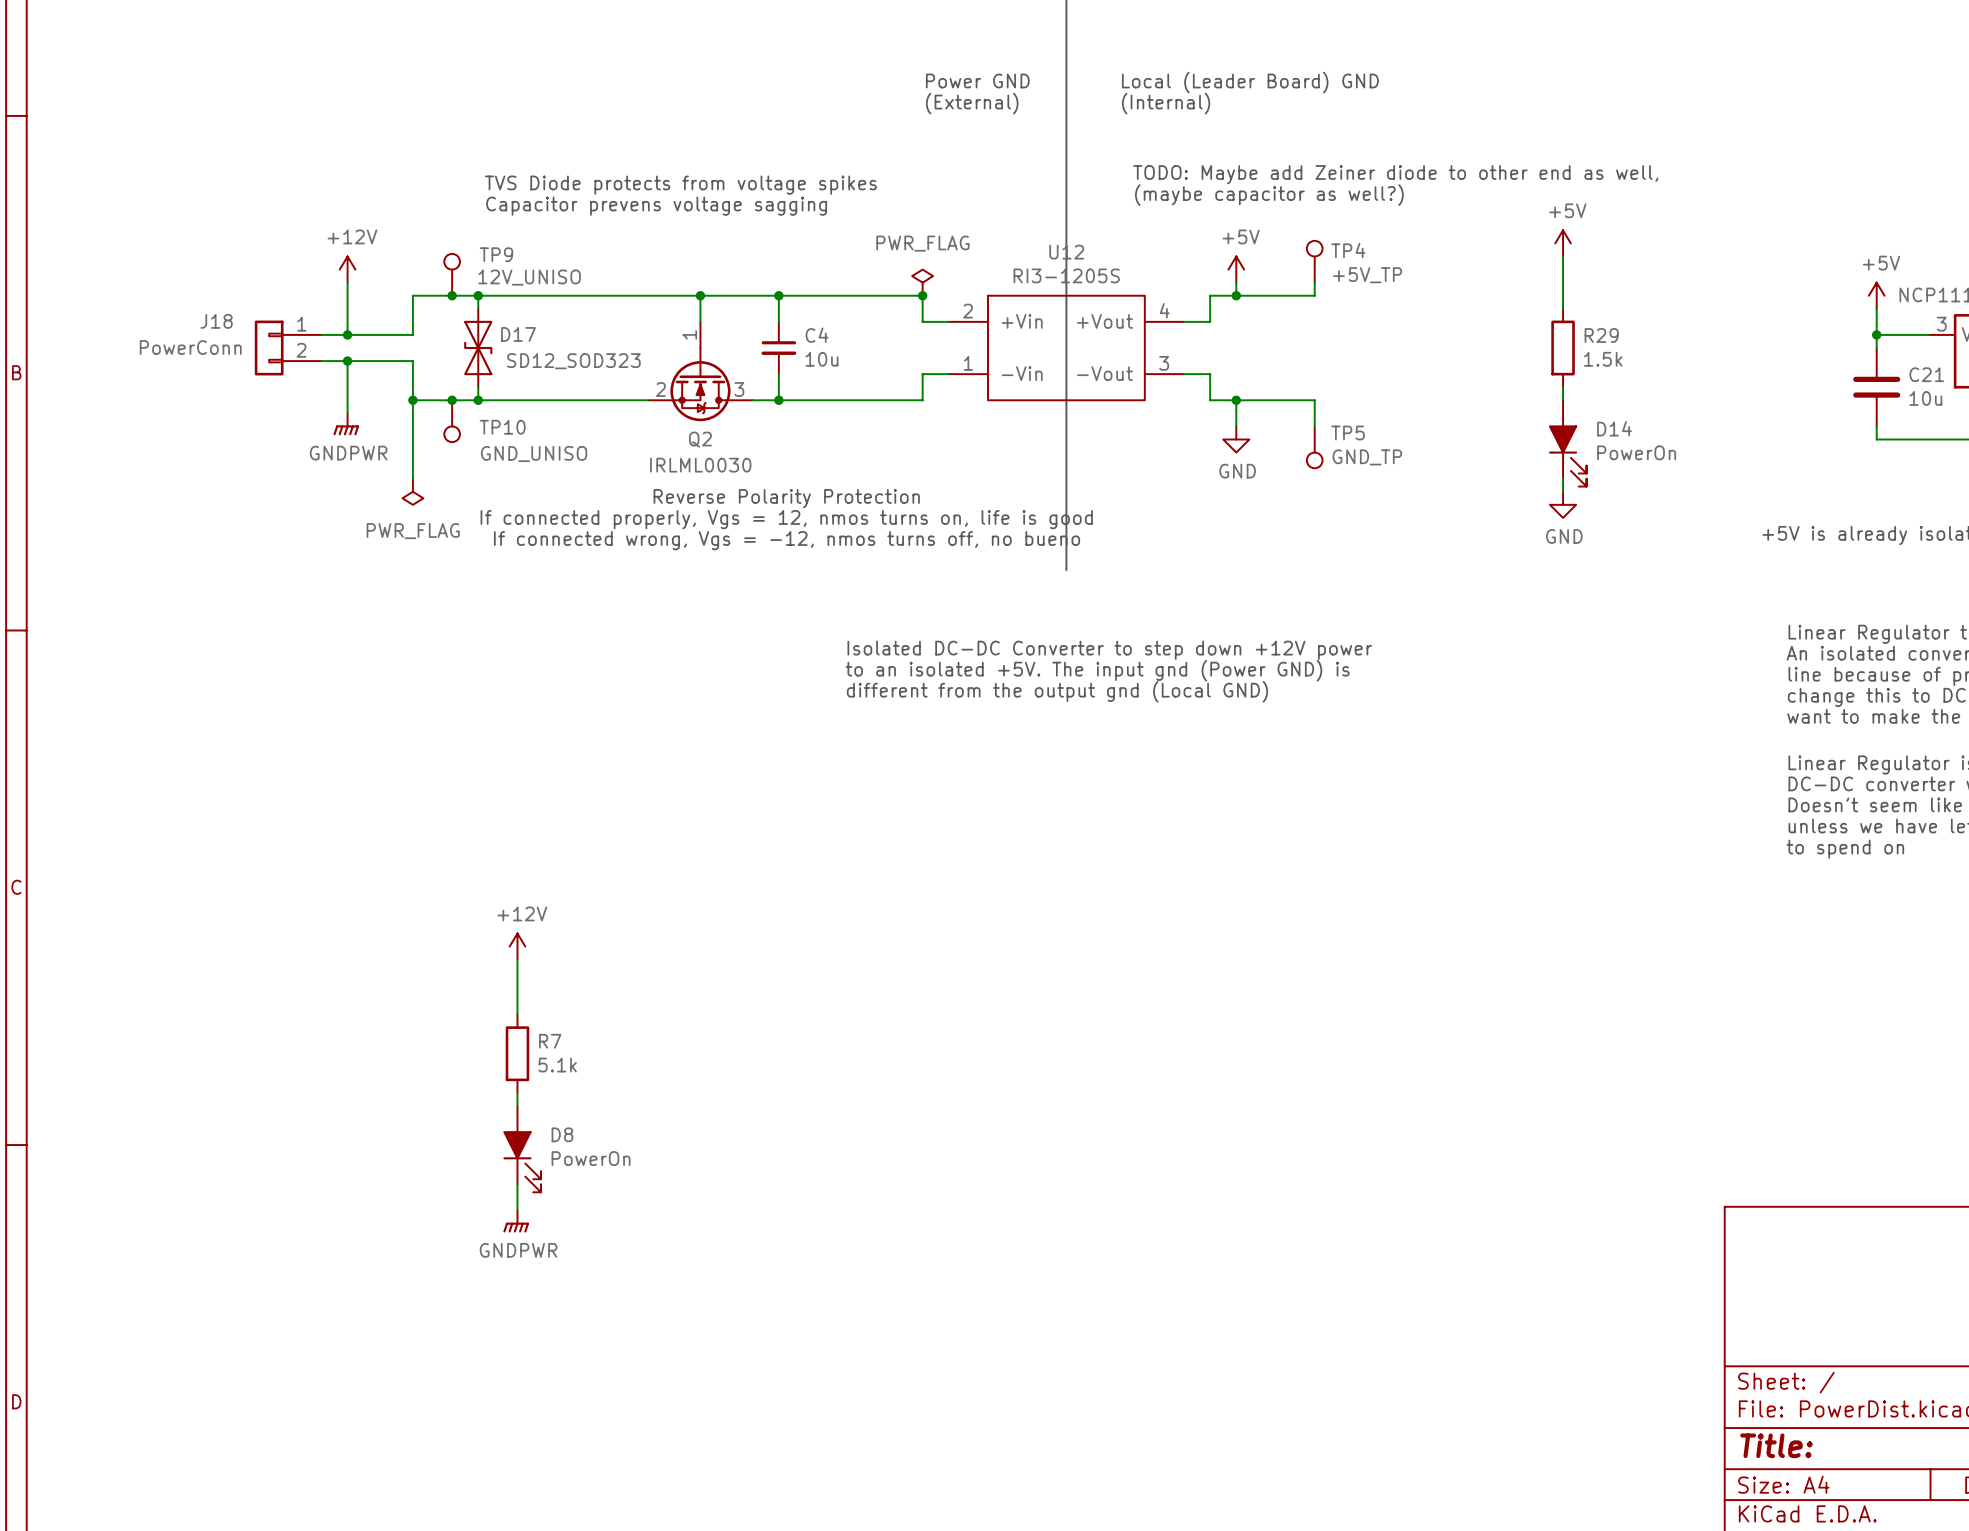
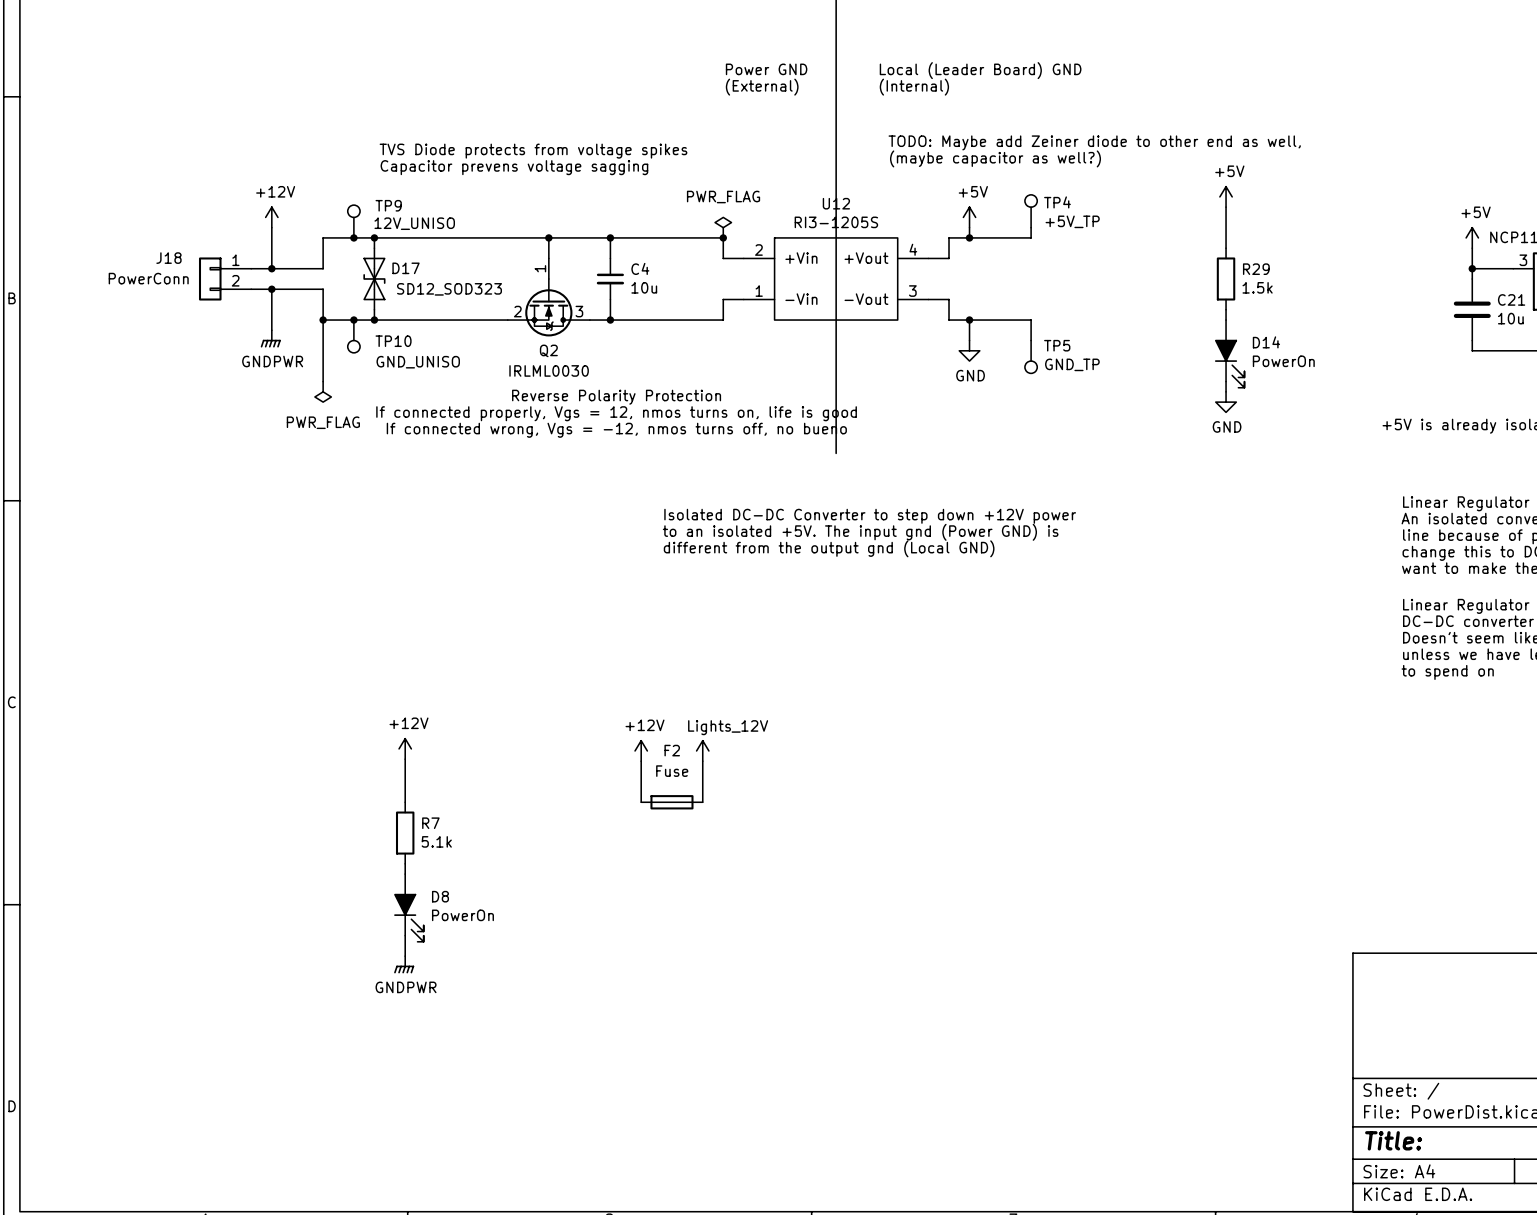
power symbol: none -> +12V (641, 750)
power symbol: none -> Lights_12V (702, 750)
wire: none -> (641, 761) (641, 802)
wire: none -> (702, 761) (702, 802)
F2: none -> Fuse (671, 802)

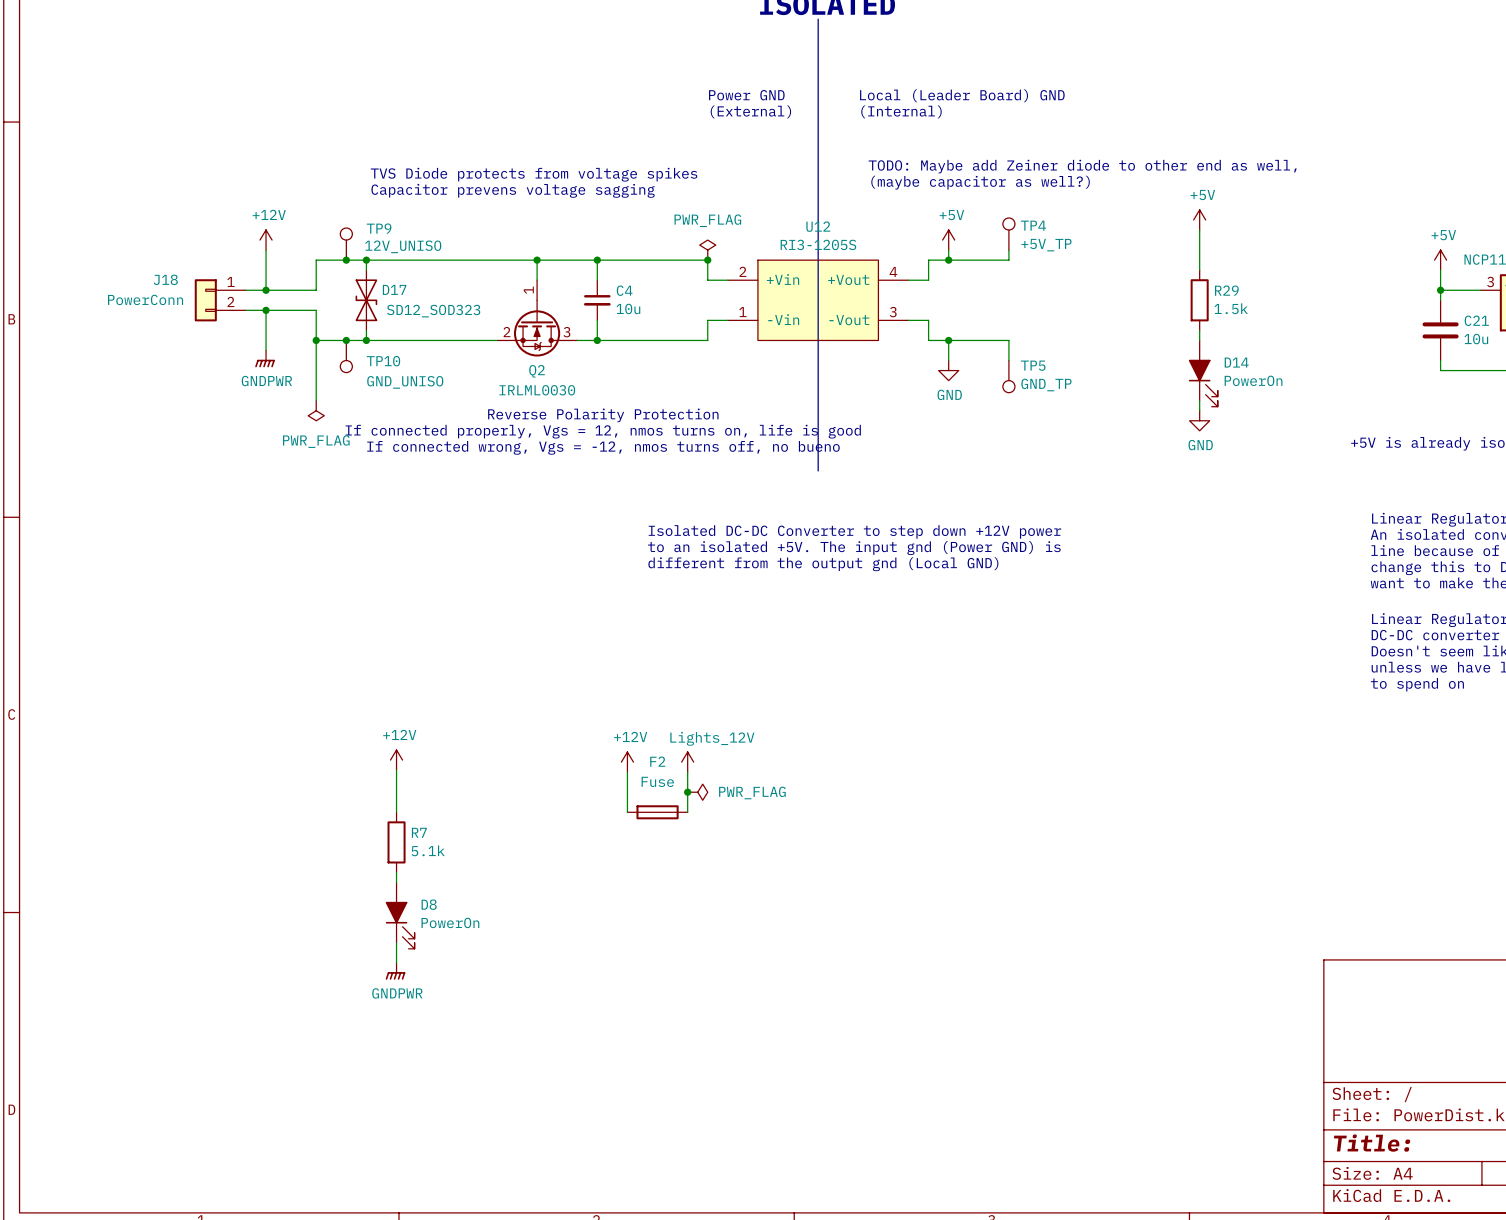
junction: none -> (687, 792)
power symbol: none -> PWR_FLAG (697, 792)

